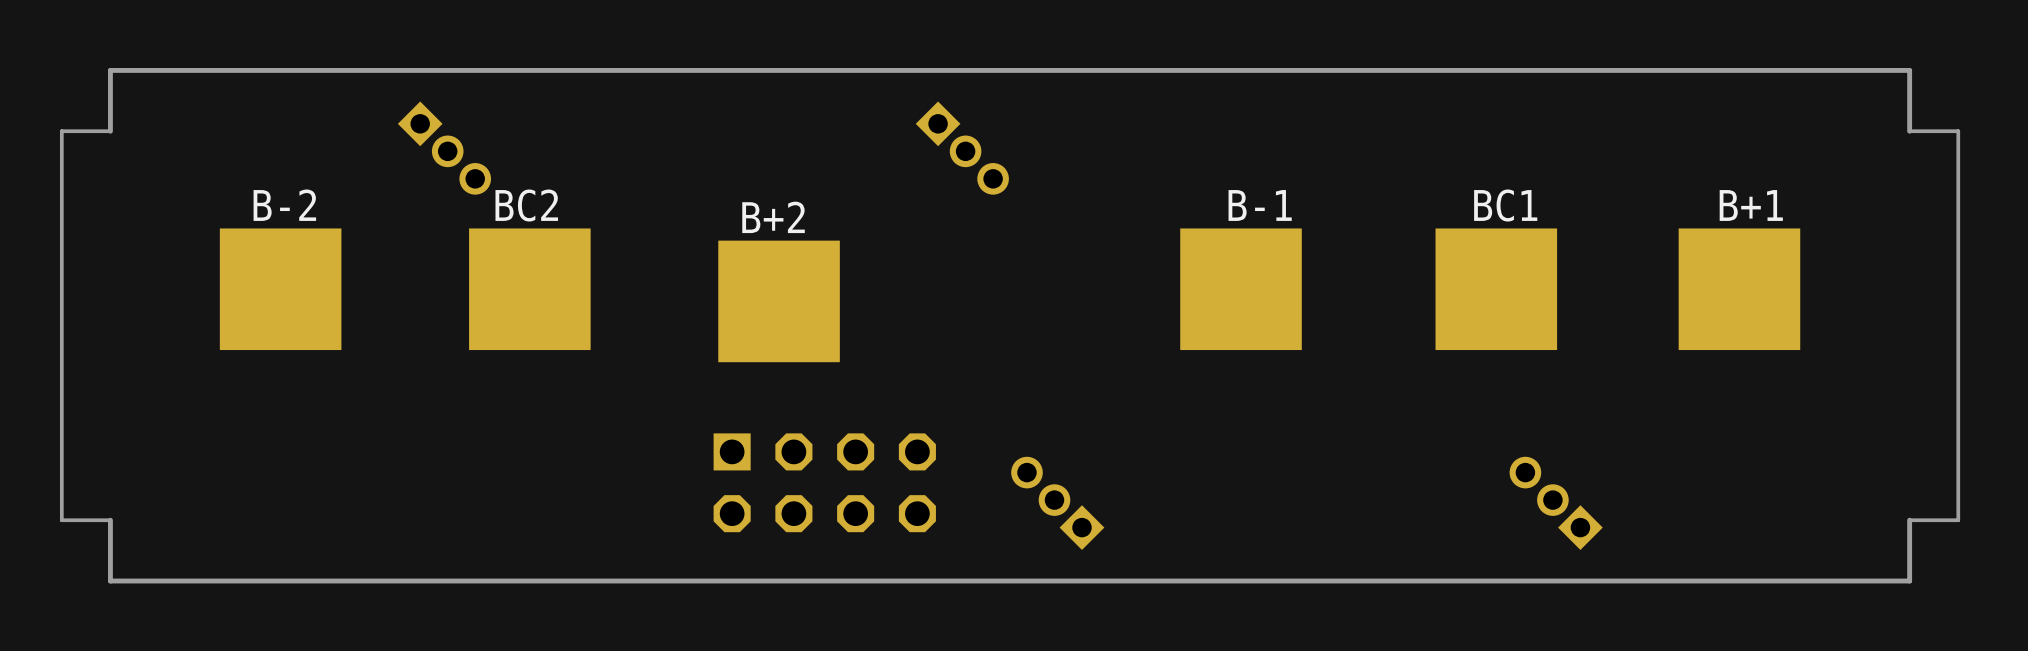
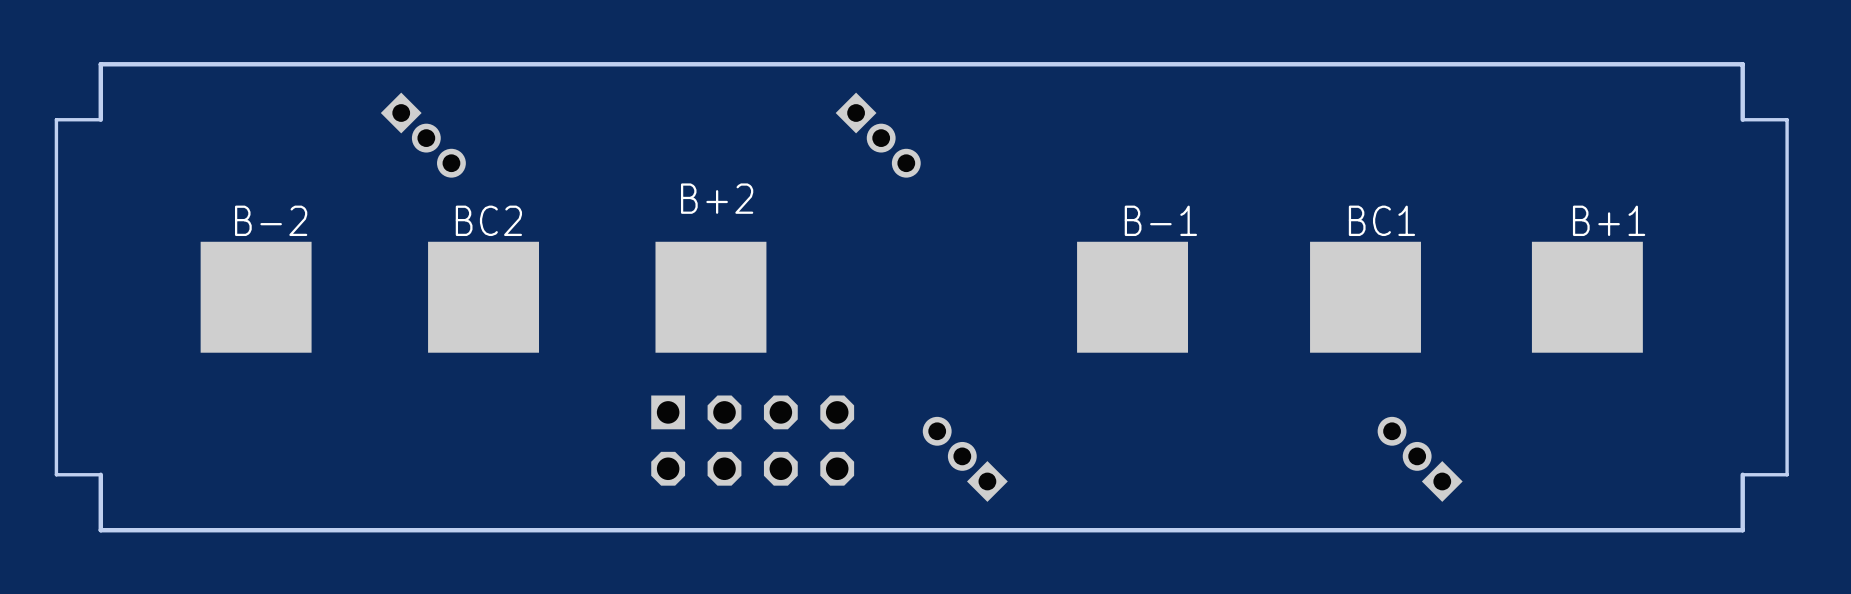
part position: (444, 148) -> (423, 135)
B-2 position: (280, 289) -> (256, 297)
BC2 position: (529, 289) -> (483, 297)
B-1 position: (1241, 289) -> (1132, 297)
BC1 position: (1496, 289) -> (1365, 297)
B+1 position: (1739, 289) -> (1587, 297)
B+2 position: (779, 301) -> (710, 297)

